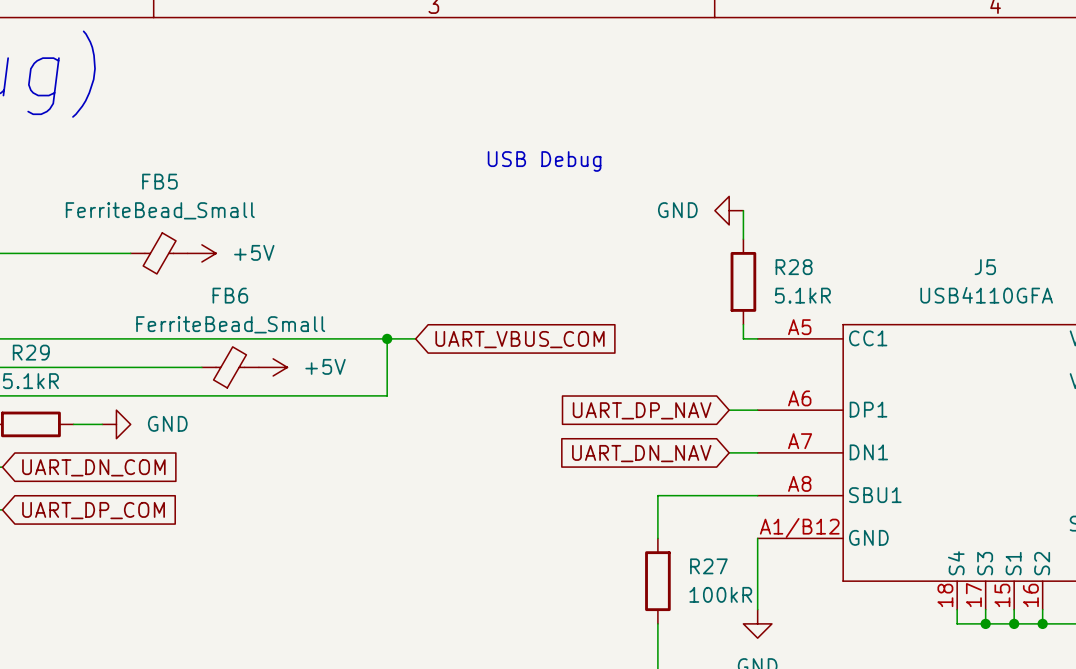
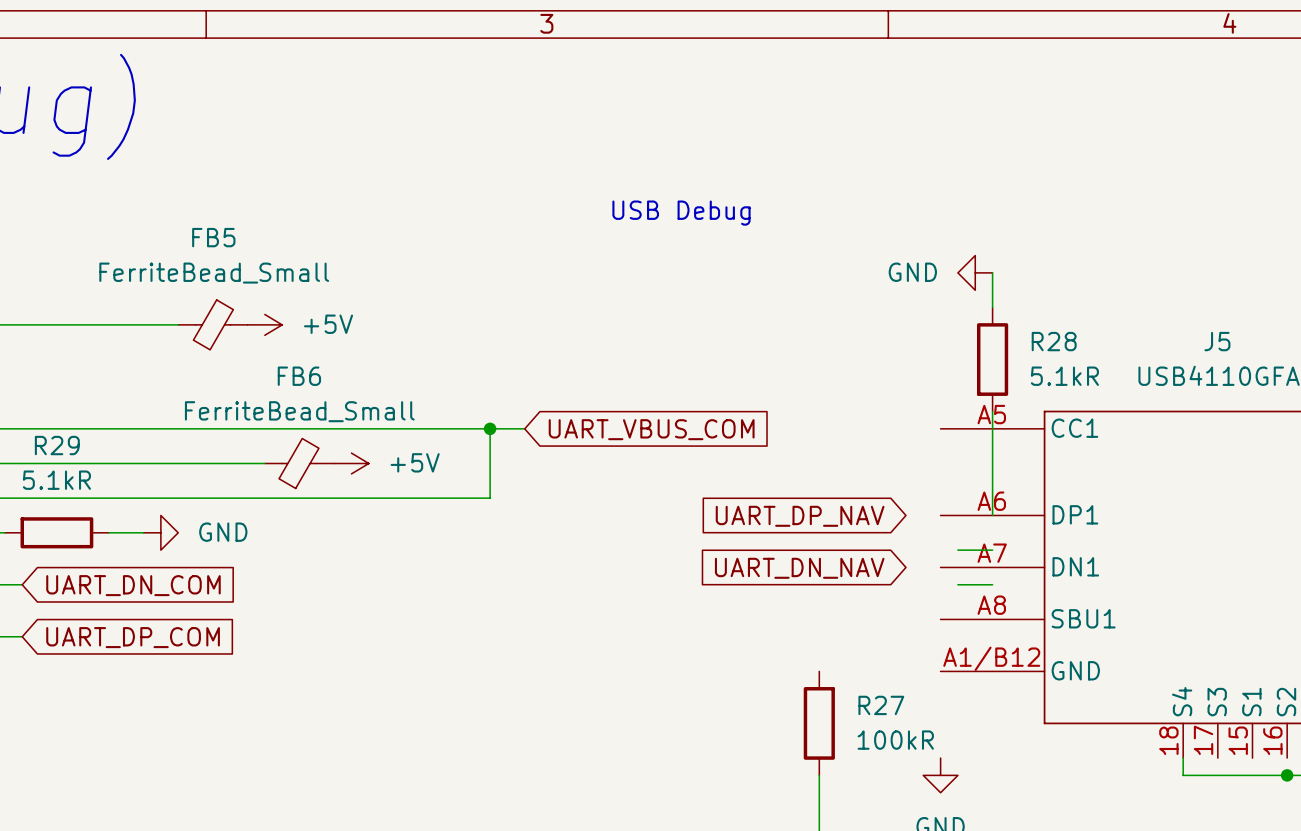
power symbol position: GND (729, 210) -> GND (975, 272)
wire: (743, 210) (743, 239) -> (992, 272) (992, 307)
R28 position: (743, 281) -> (992, 359)
wire: (743, 324) (743, 338) (757, 338) -> none
wire: none -> (992, 411) (992, 515)
wire: (729, 410) (757, 410) -> (957, 584) (992, 584)
wire: (729, 452) (757, 452) -> (957, 550) (992, 550)
wire: (757, 495) (657, 495) (657, 538) -> none
wire: (757, 538) (757, 609) -> none
wire: (985, 609) (985, 623) -> none
wire: (1014, 609) (1014, 623) -> none
wire: (1042, 609) (1042, 623) -> none
junction: (985, 623) -> none
junction: (1014, 623) -> none

